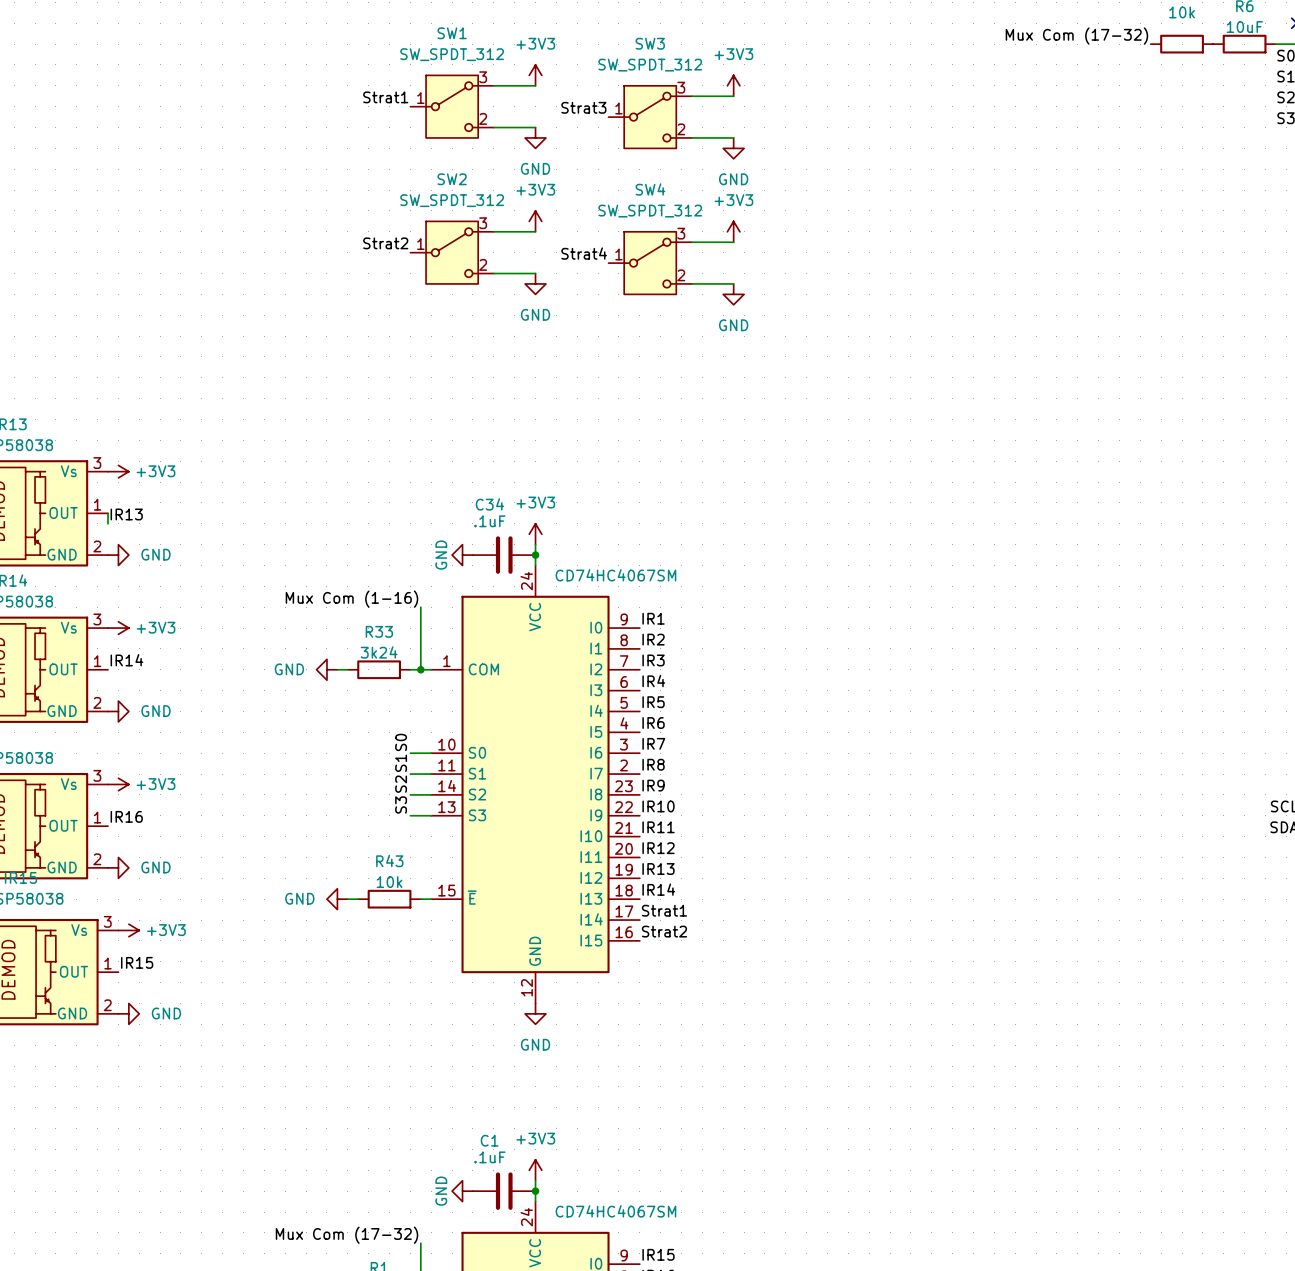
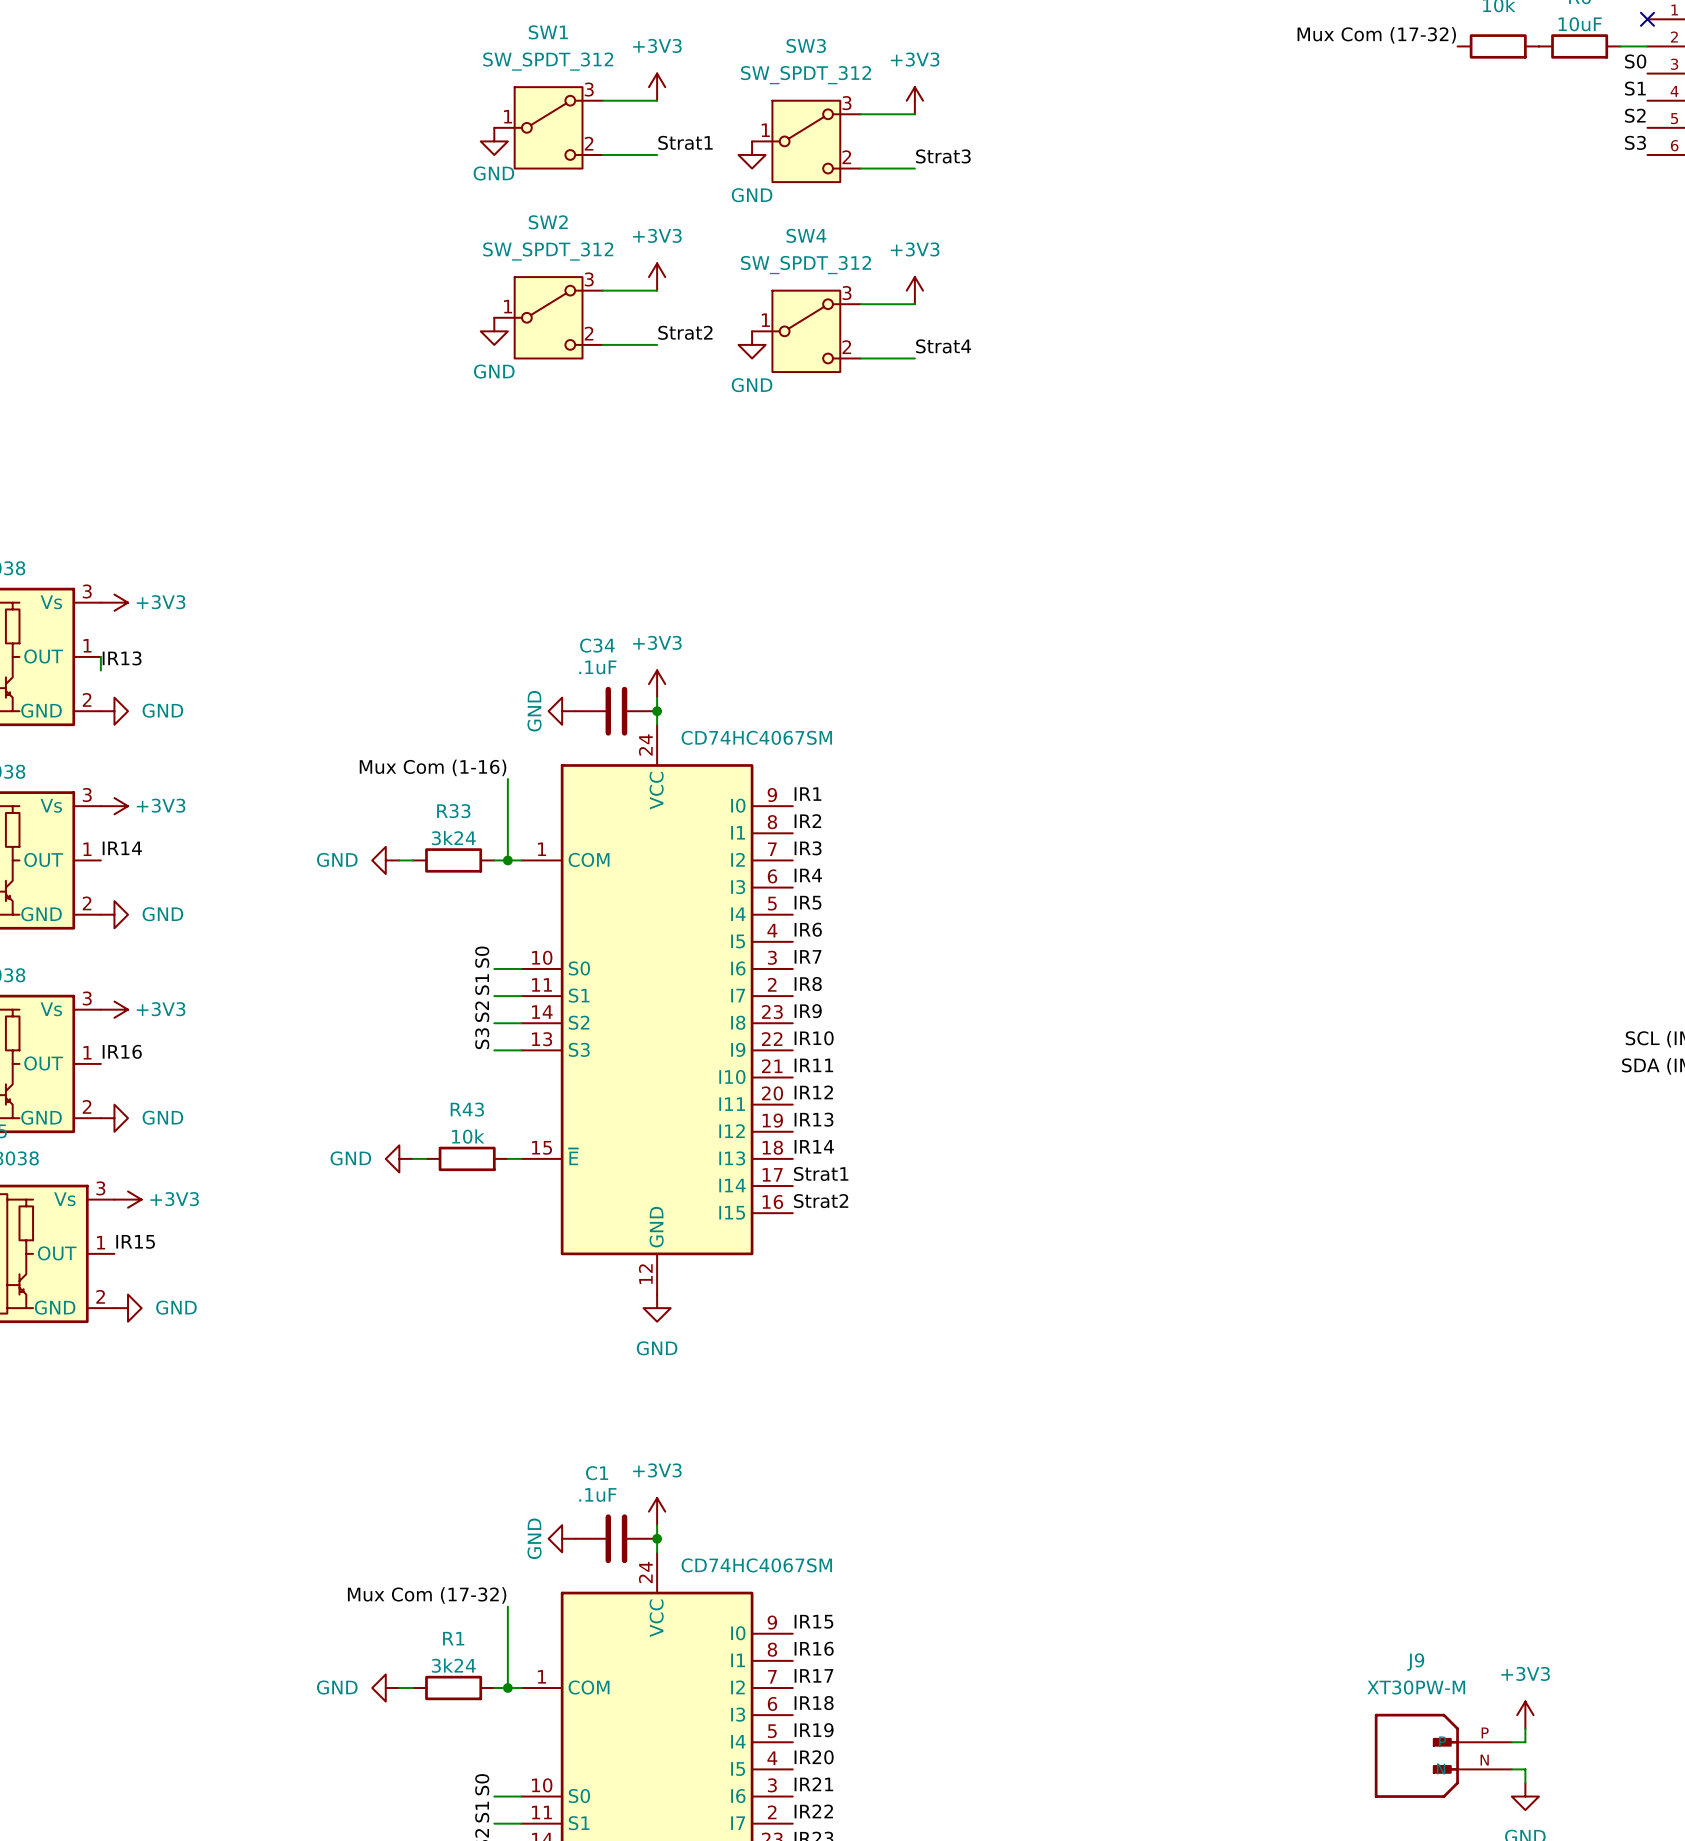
label position: Strat1 (385, 97) -> Strat1 (685, 142)
label position: Strat3 (583, 107) -> Strat3 (943, 156)
power symbol: none -> GND (494, 141)
power symbol: none -> GND (752, 154)
power symbol: GND (535, 137) -> none
power symbol: GND (733, 148) -> none
label position: Strat2 (385, 243) -> Strat2 (685, 332)
label position: Strat4 (584, 253) -> Strat4 (943, 346)
power symbol: none -> GND (494, 331)
power symbol: none -> GND (752, 344)
power symbol: GND (535, 283) -> none
power symbol: GND (733, 294) -> none

